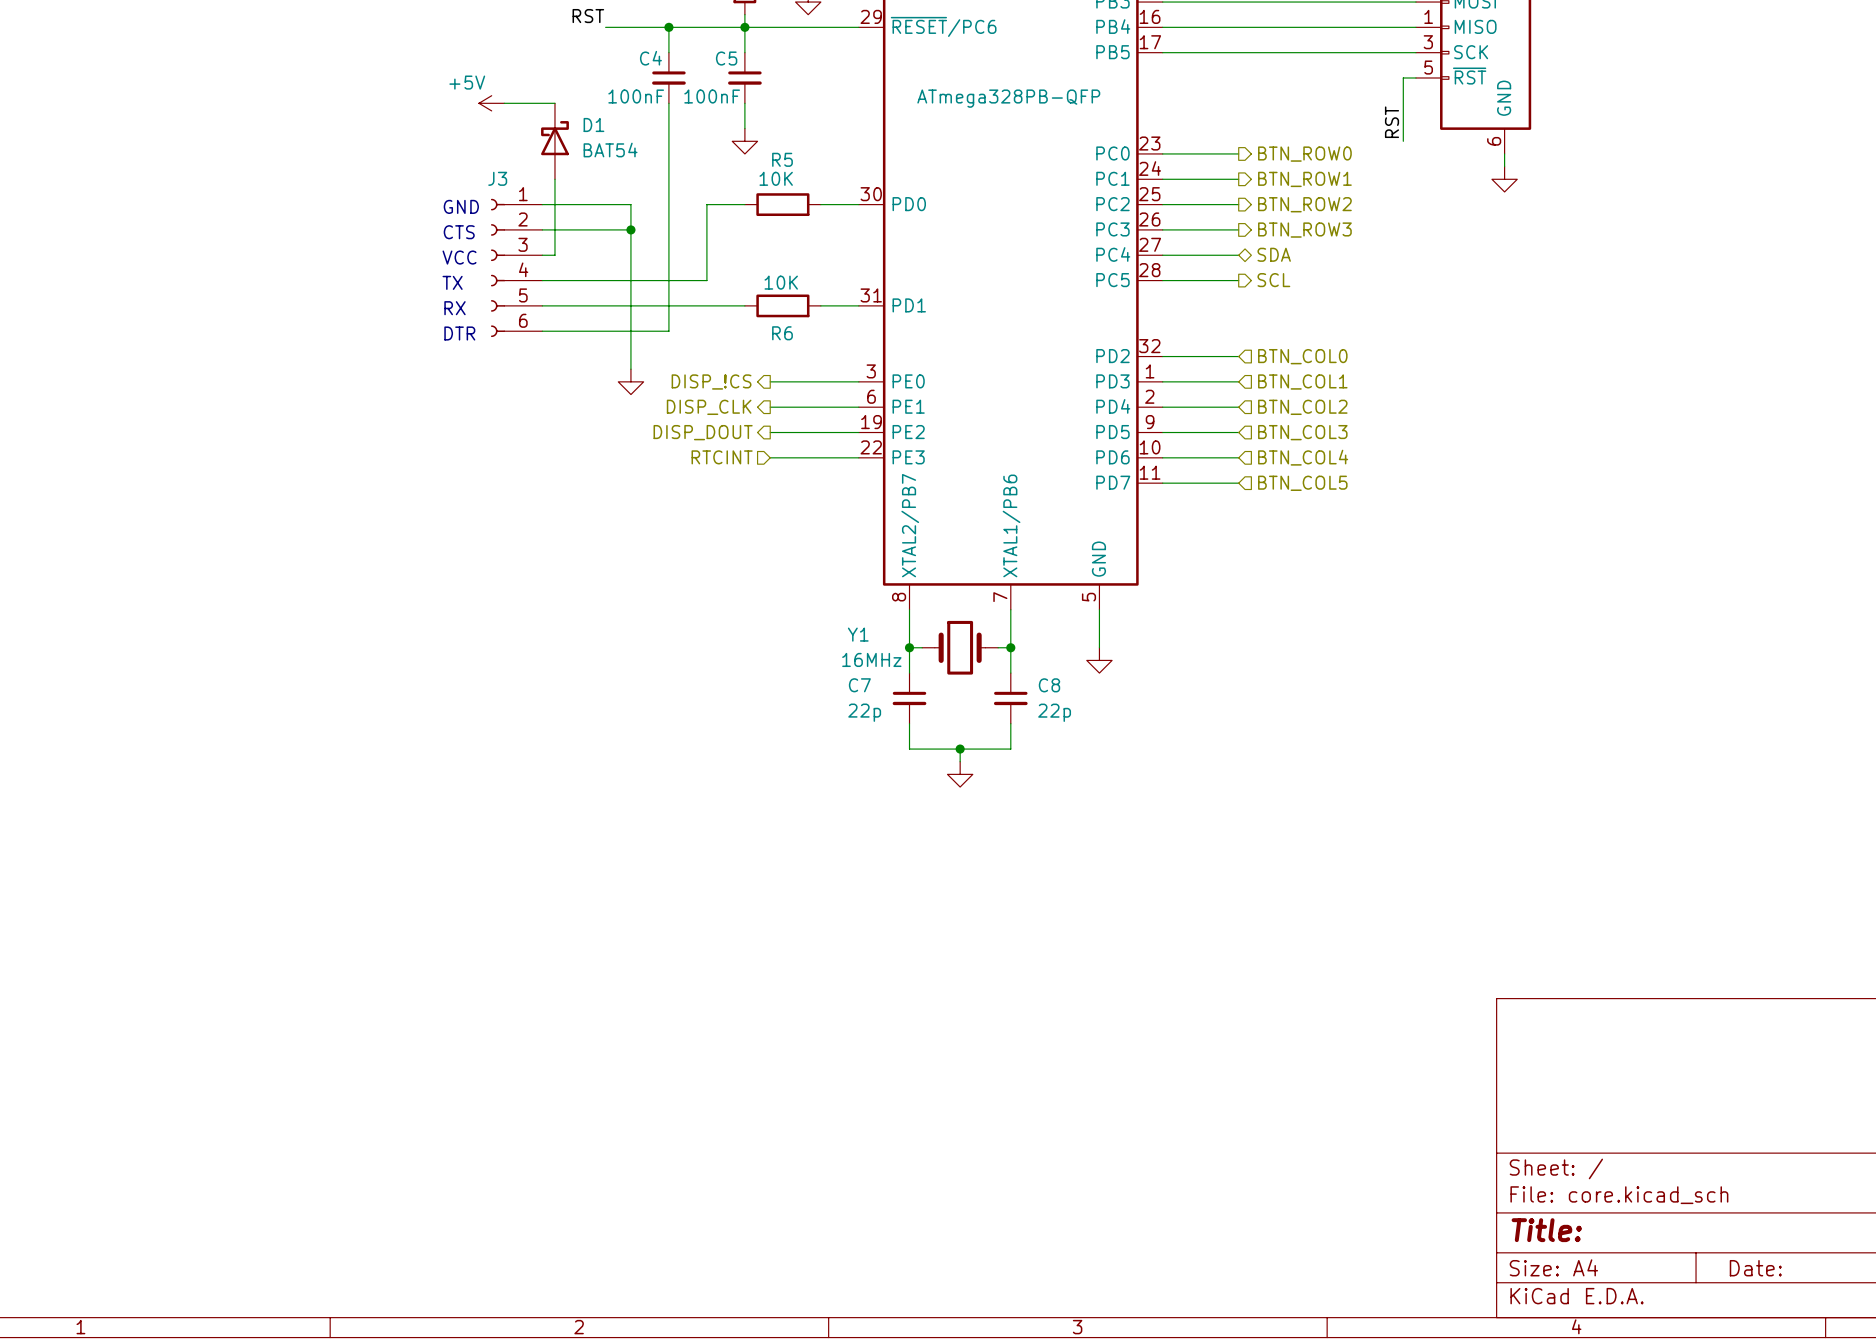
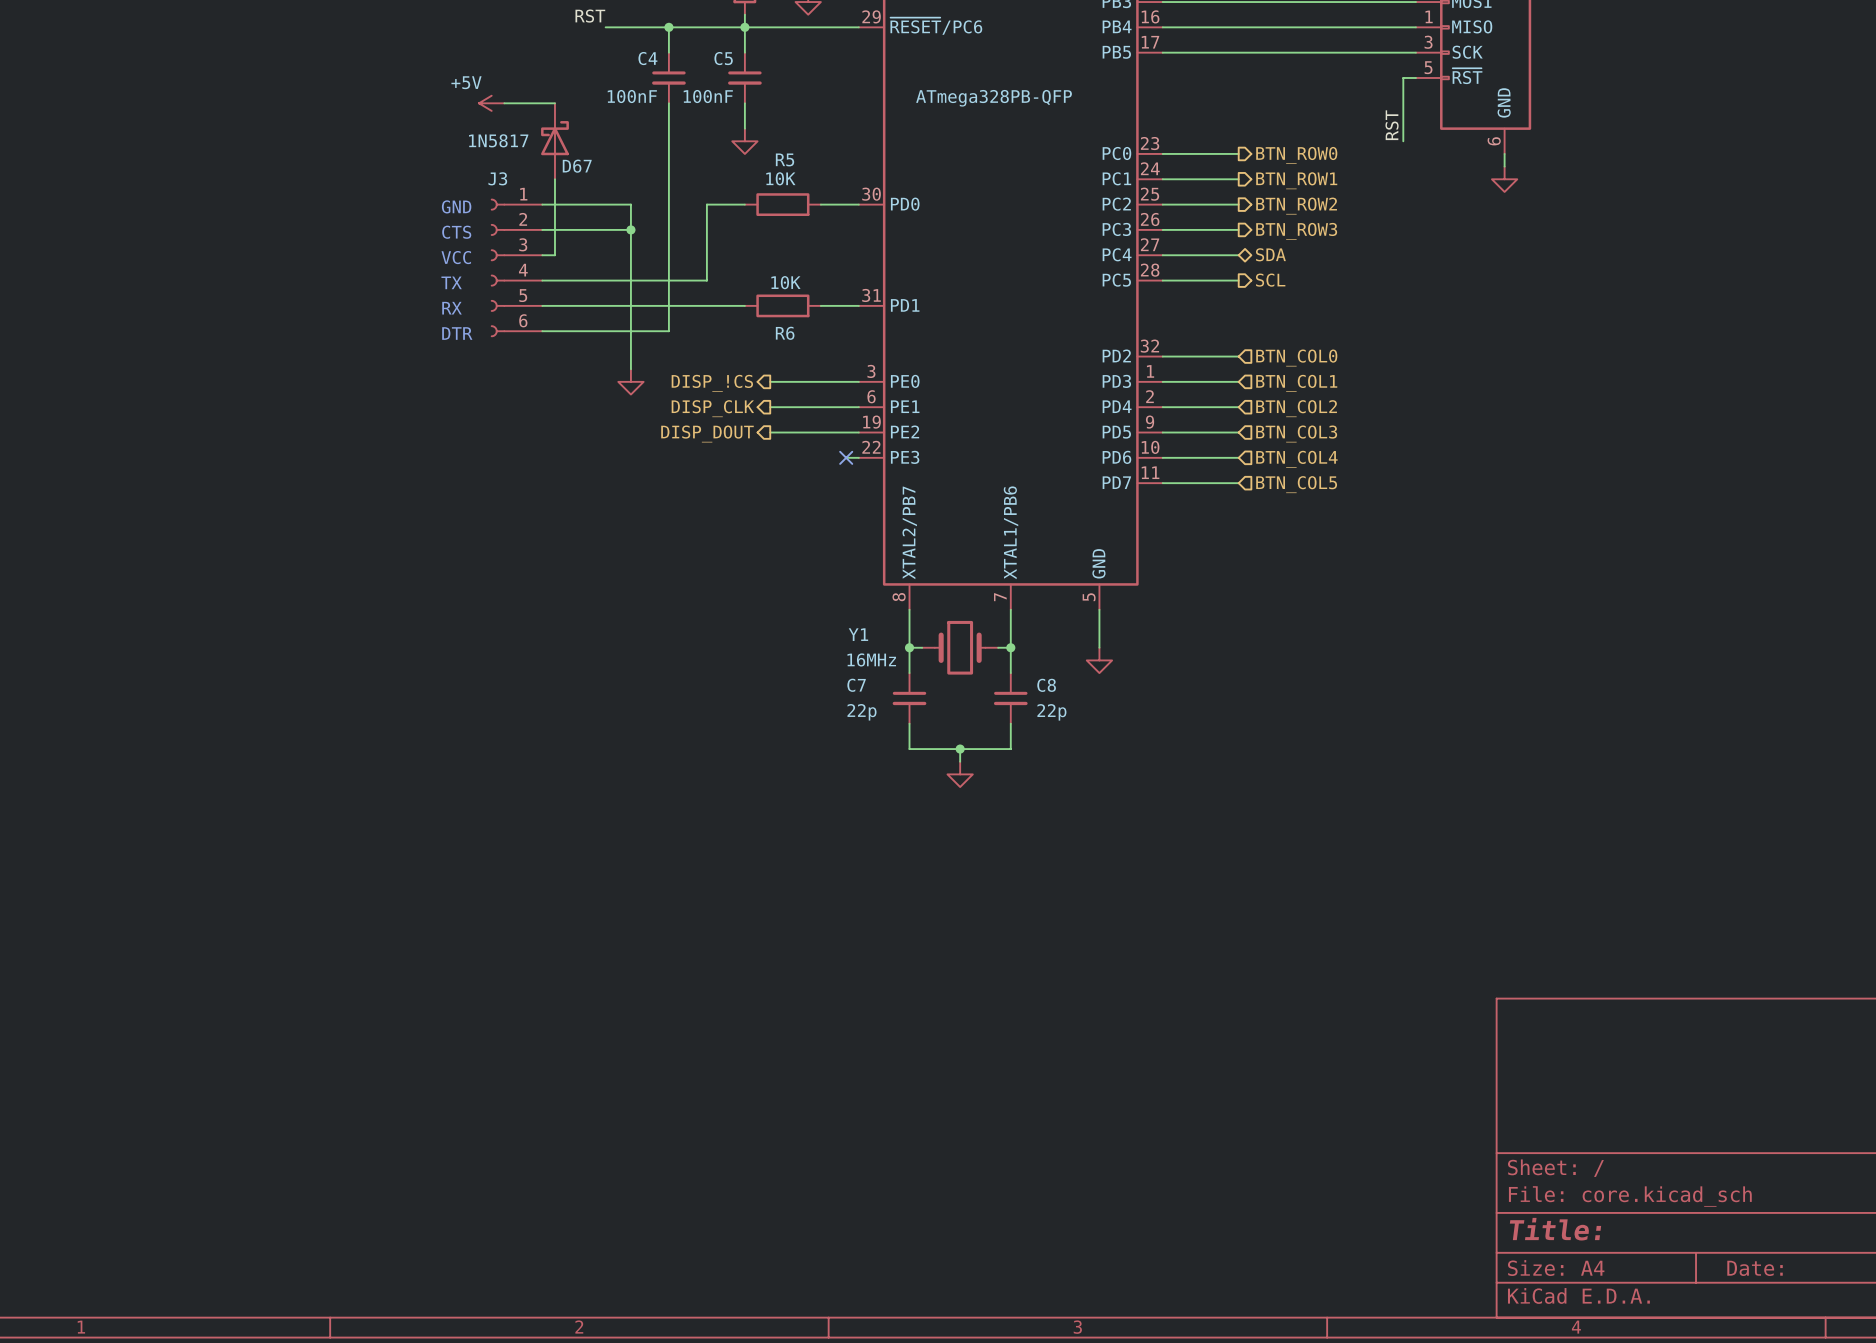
D1 name: D1 (593, 125) -> D67 (577, 166)
D1 value: BAT54 (610, 150) -> 1N5817 (498, 140)
hierarchical label: RTCINT (722, 457) -> none
wire: (770, 457) (846, 457) -> none
no-connect mark: none -> (846, 457)

